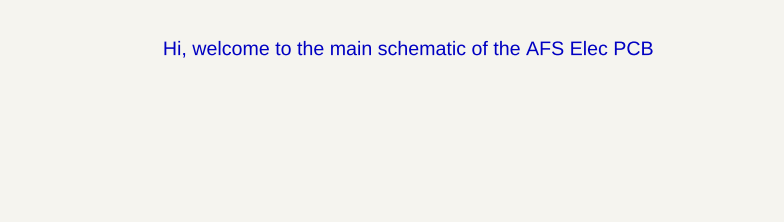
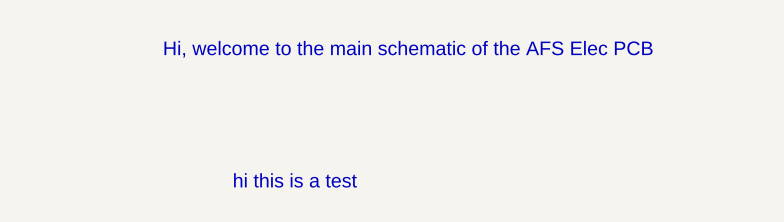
text: none -> hi this is a test (295, 180)

